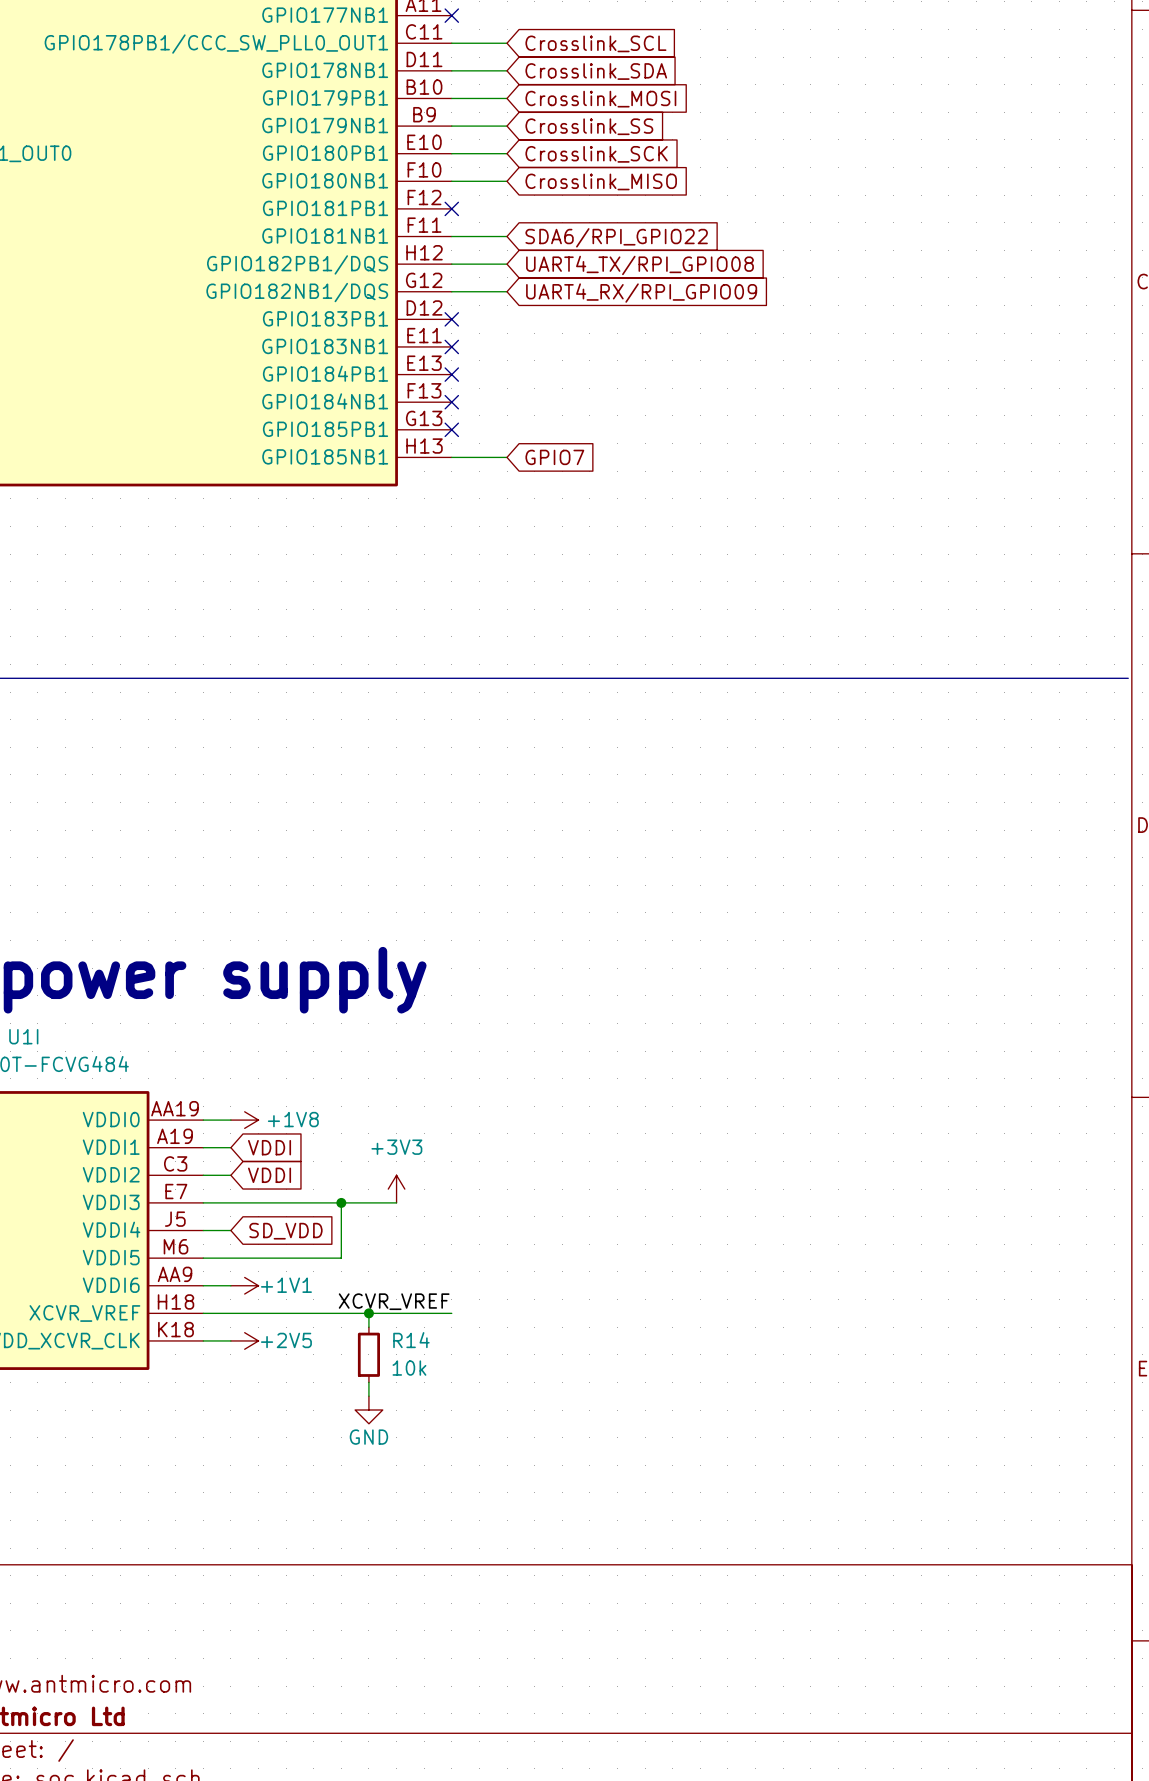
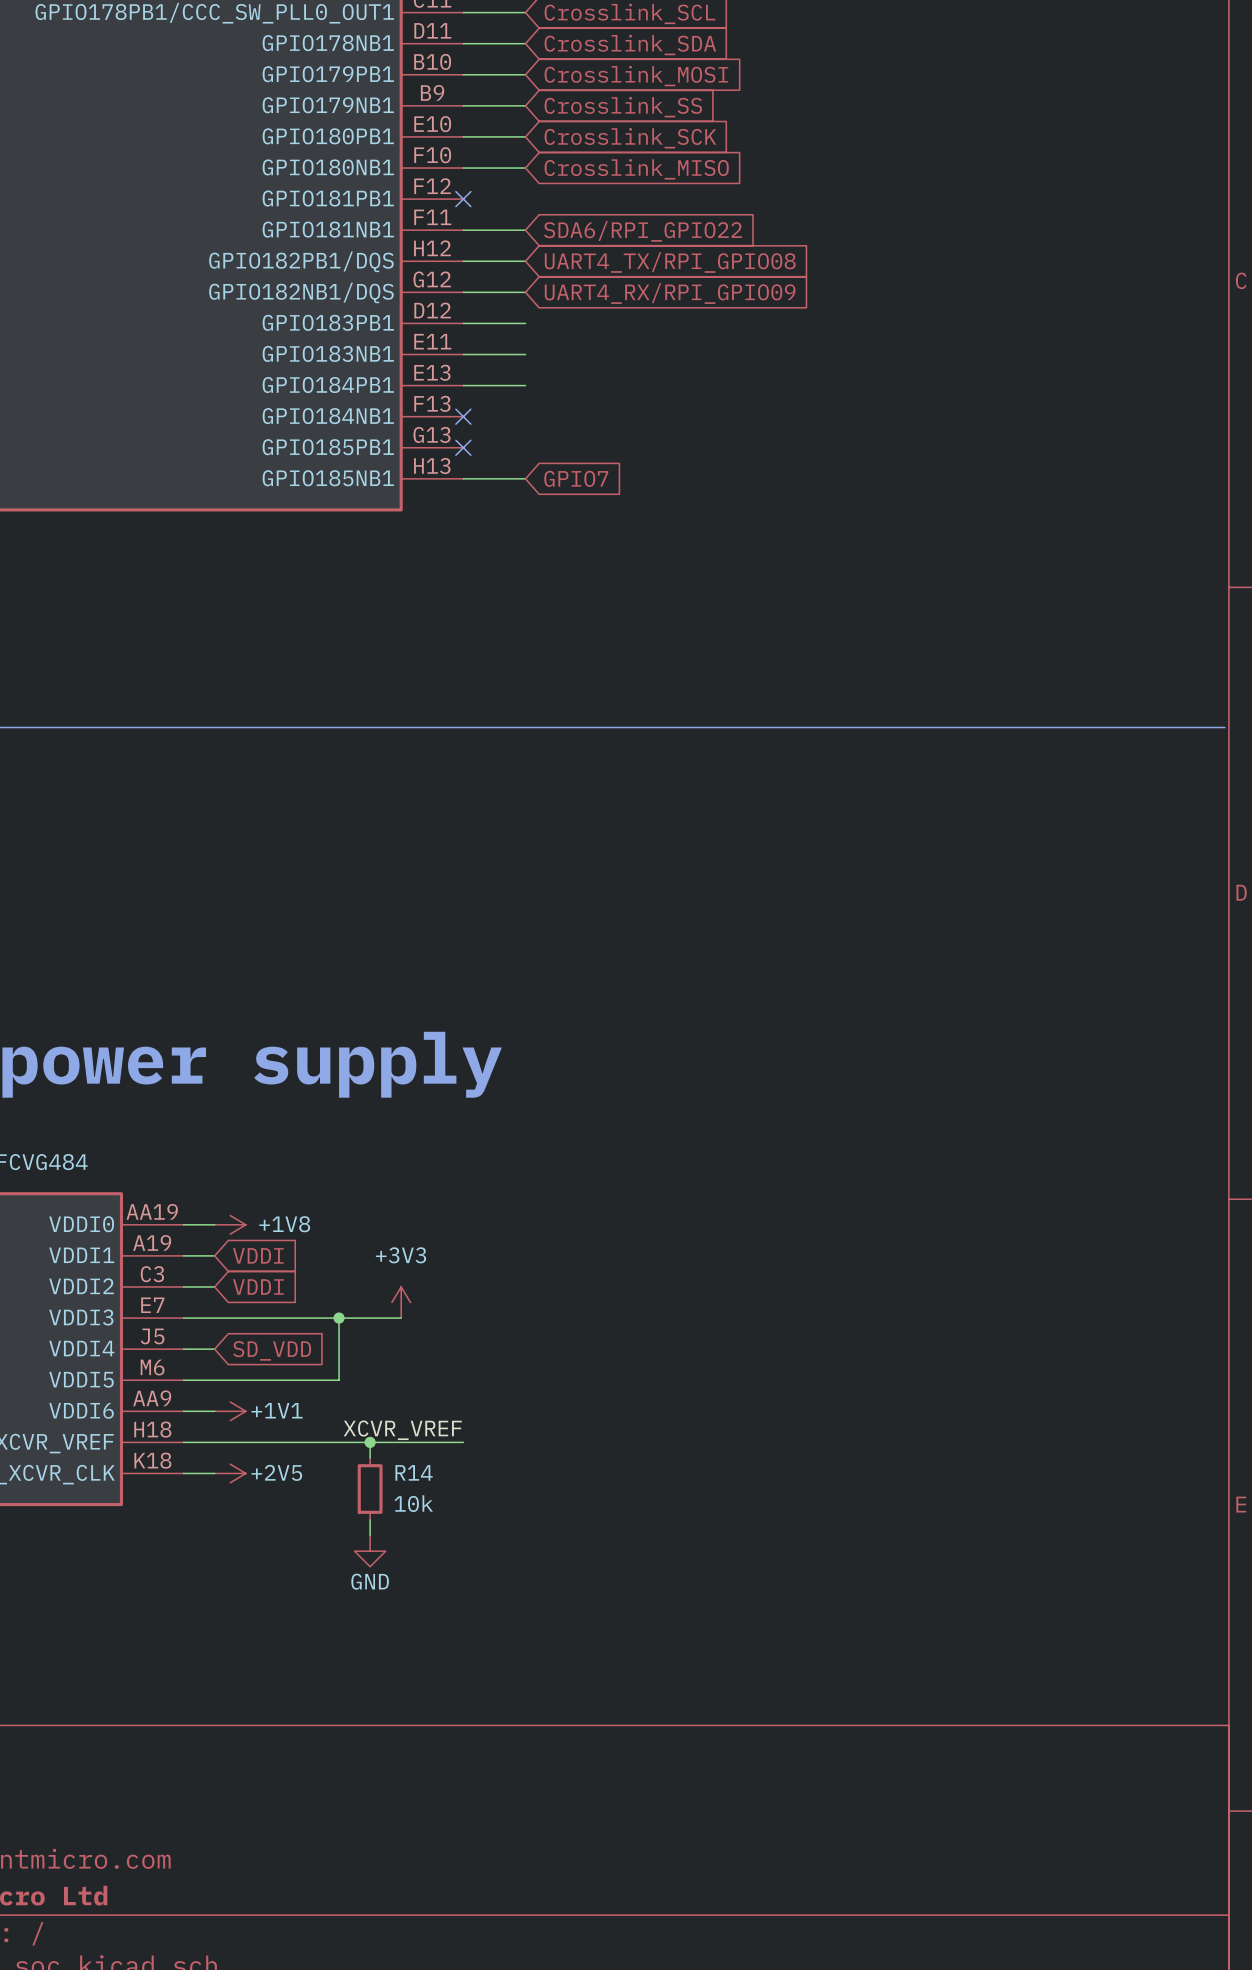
wire: none -> (463, 323) (525, 323)
no-connect mark: (451, 319) -> none
wire: none -> (463, 354) (525, 354)
no-connect mark: (451, 346) -> none
wire: none -> (463, 385) (525, 385)
no-connect mark: (451, 374) -> none

